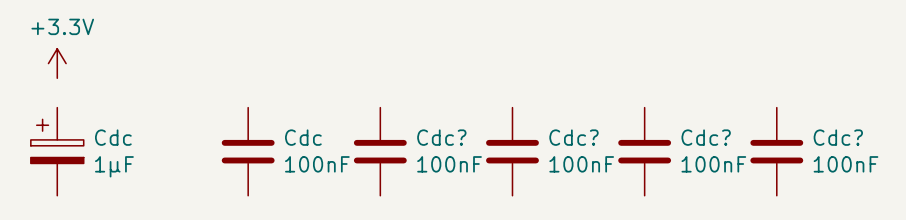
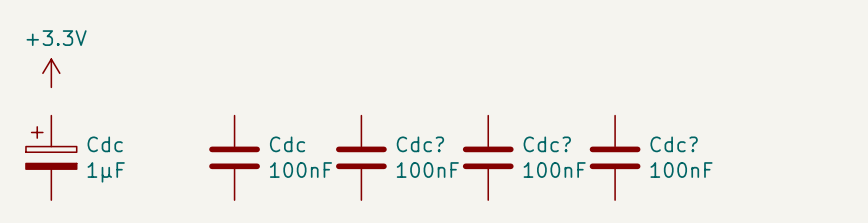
Cdc?: 100nF (776, 151) -> none

